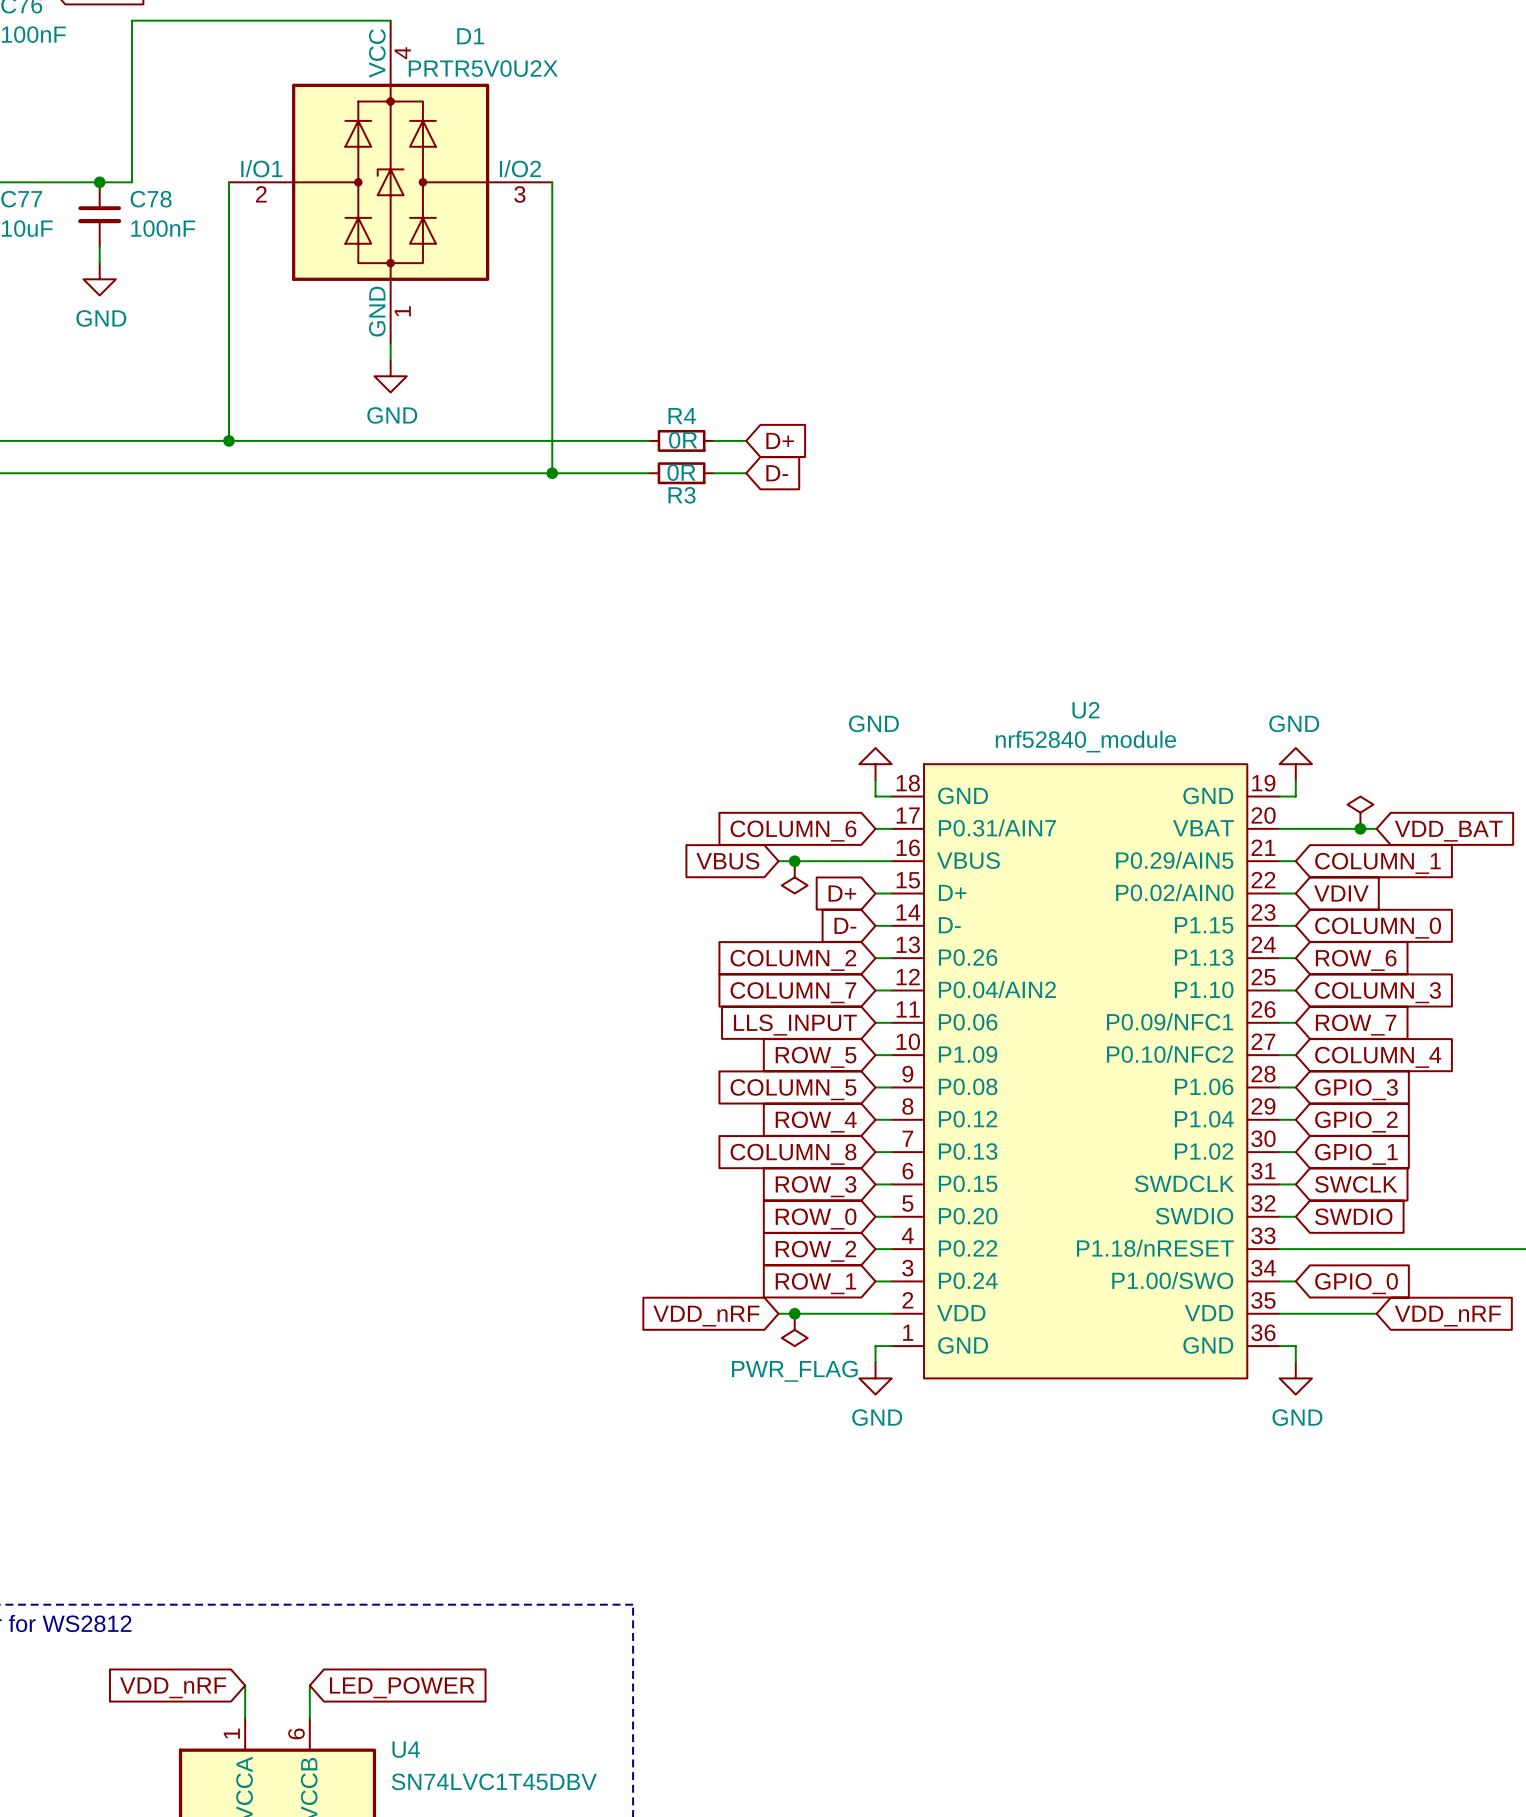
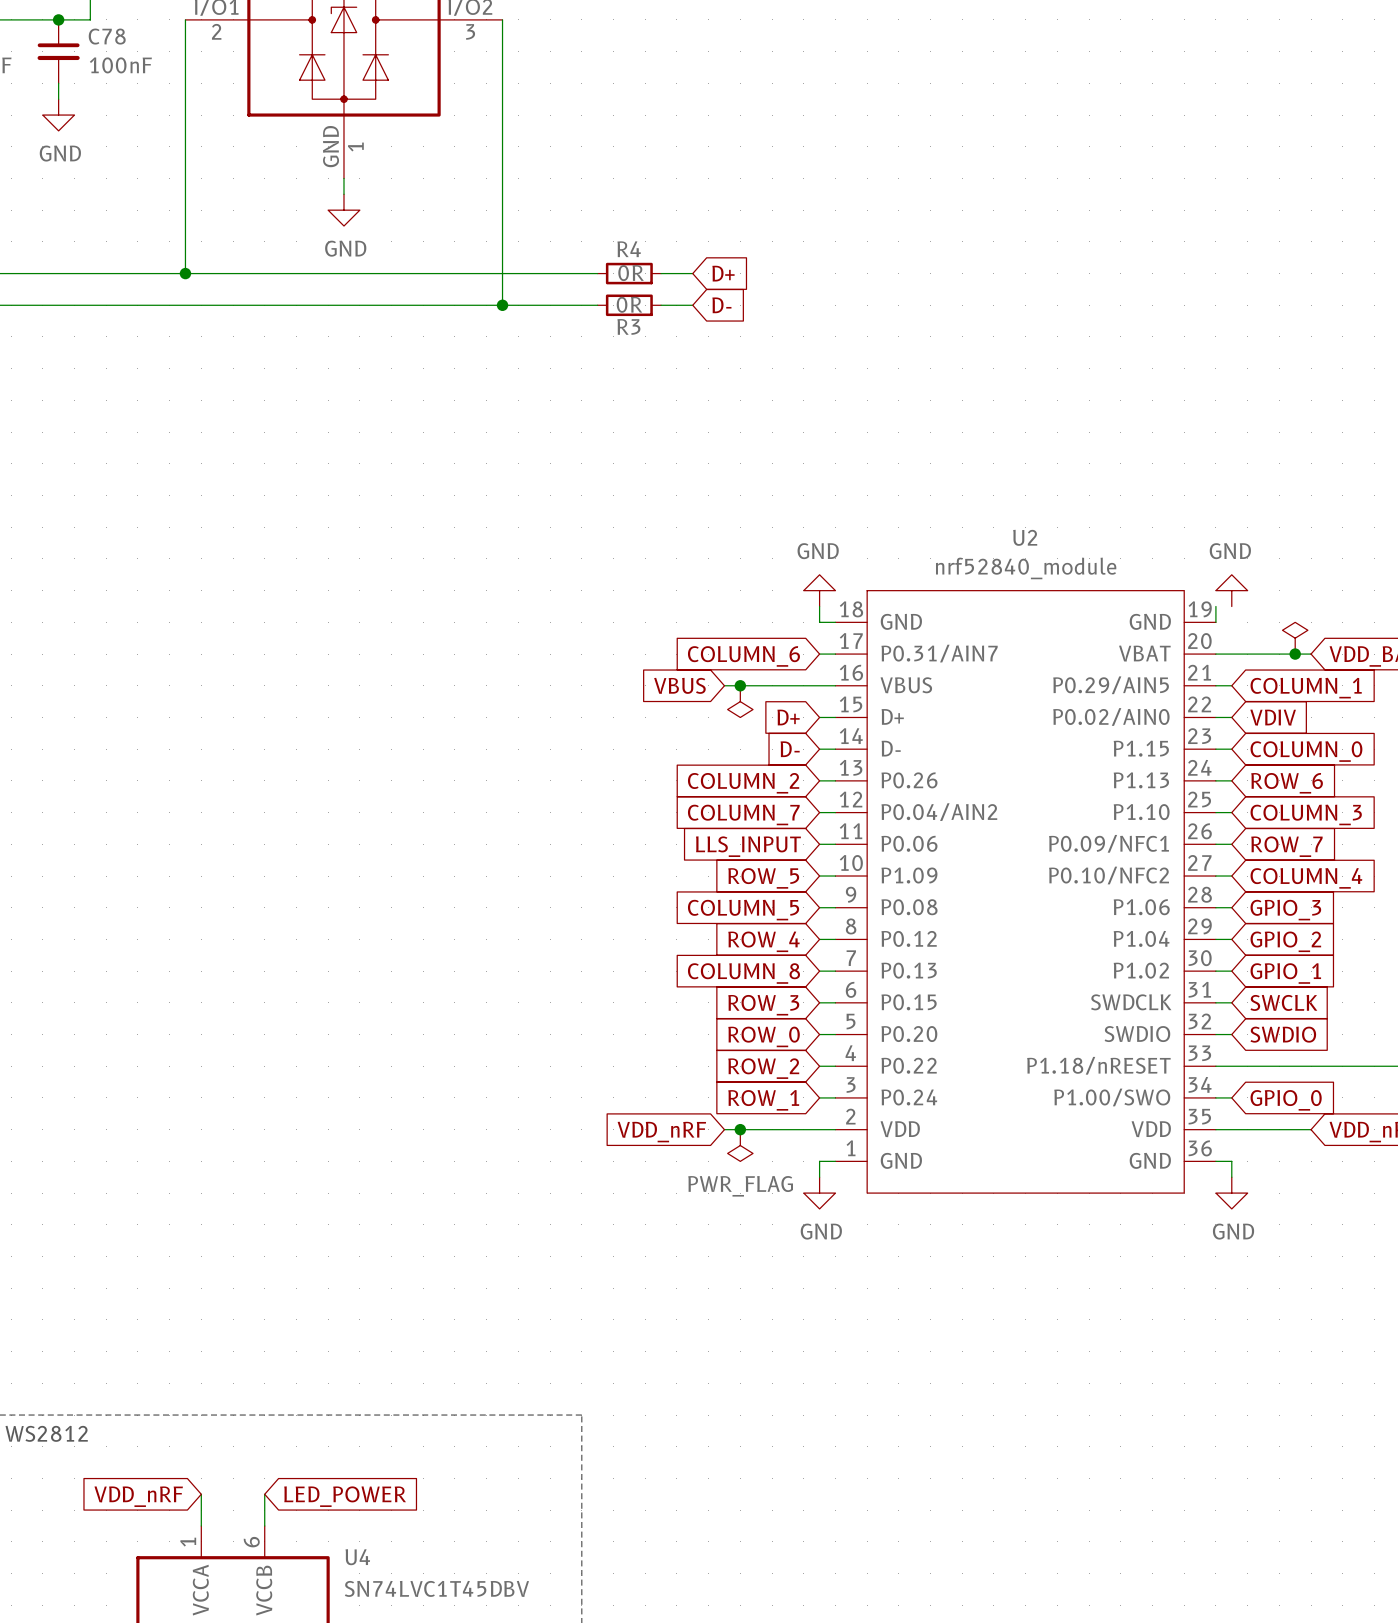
wire: (1295, 780) (1295, 796) (1279, 796) -> (1215, 606) (1215, 622)

